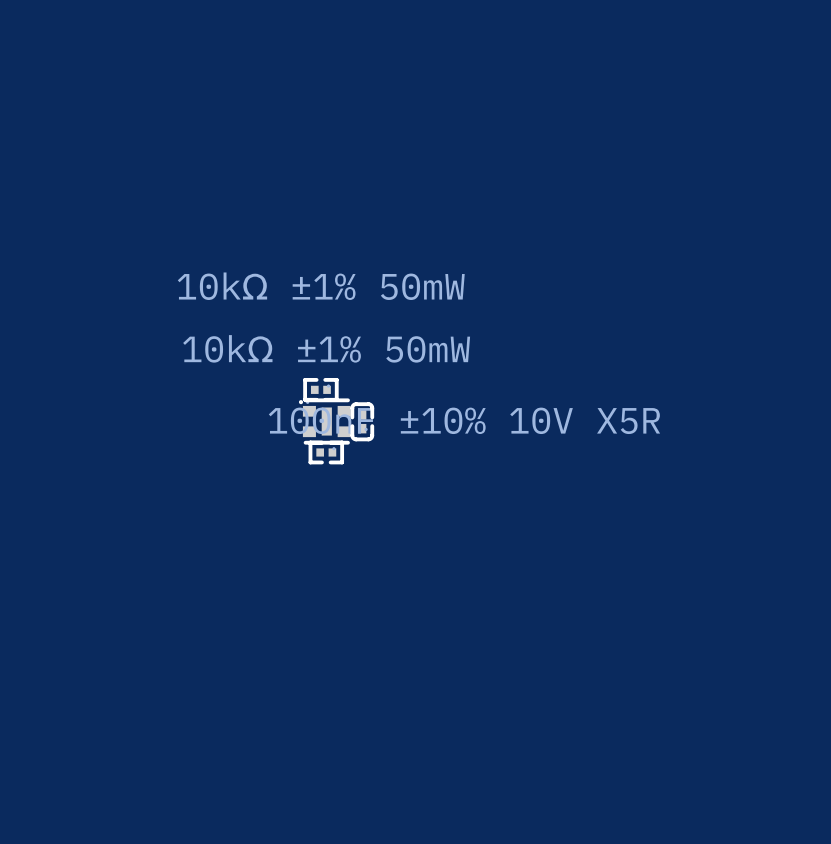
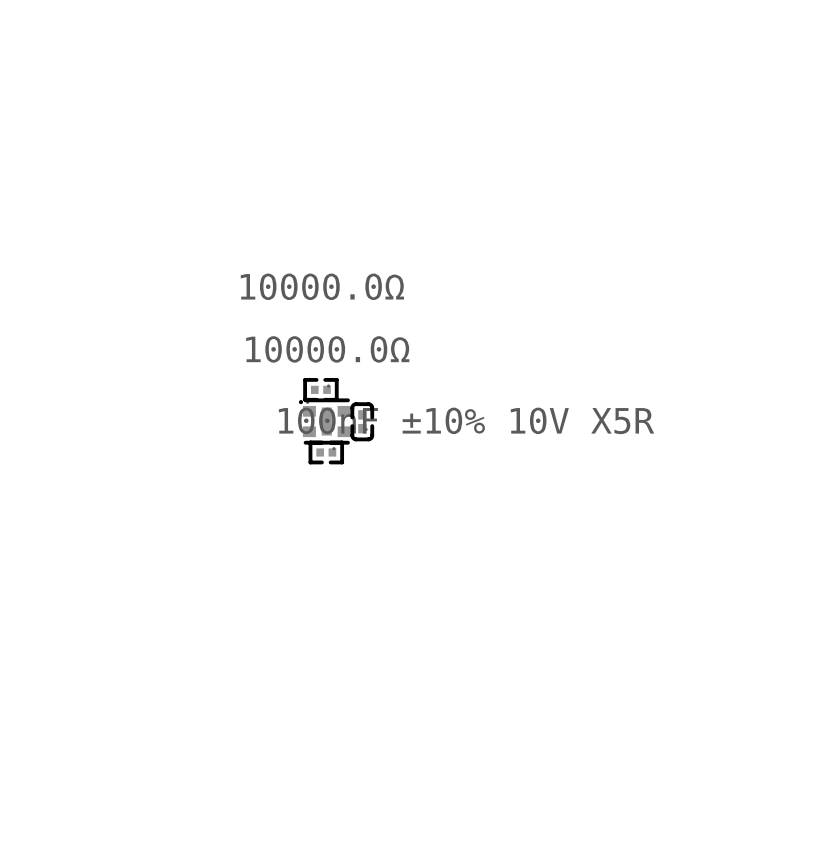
part value: 10kΩ ±1% 50mW (321, 286) -> 10000.0Ω (322, 286)
part value: 10kΩ ±1% 50mW (326, 348) -> 10000.0Ω (327, 349)

